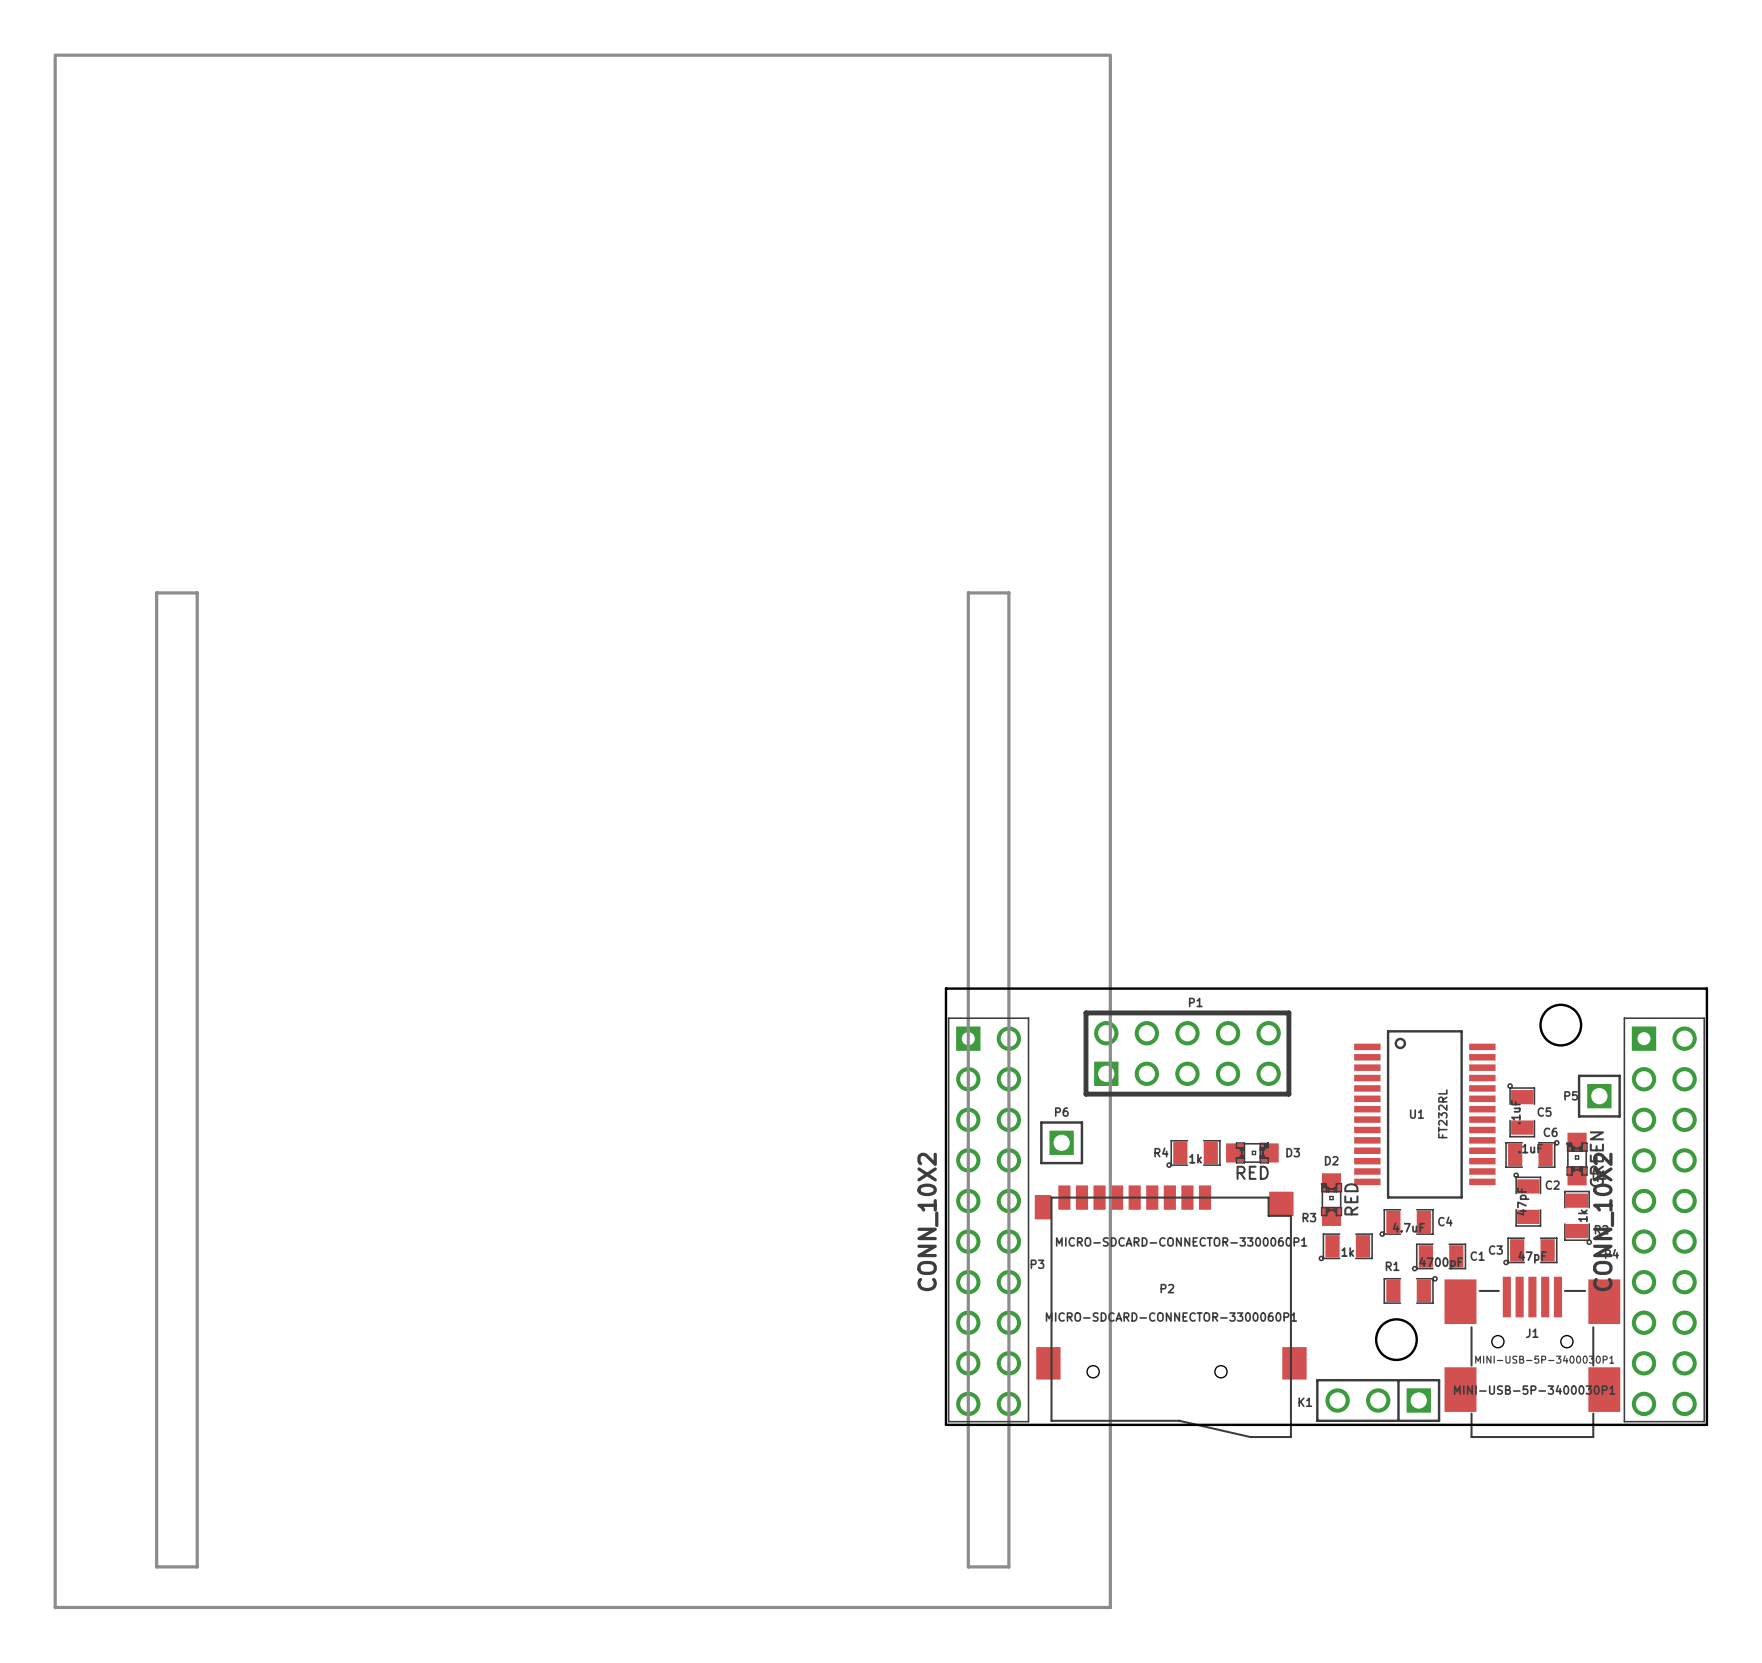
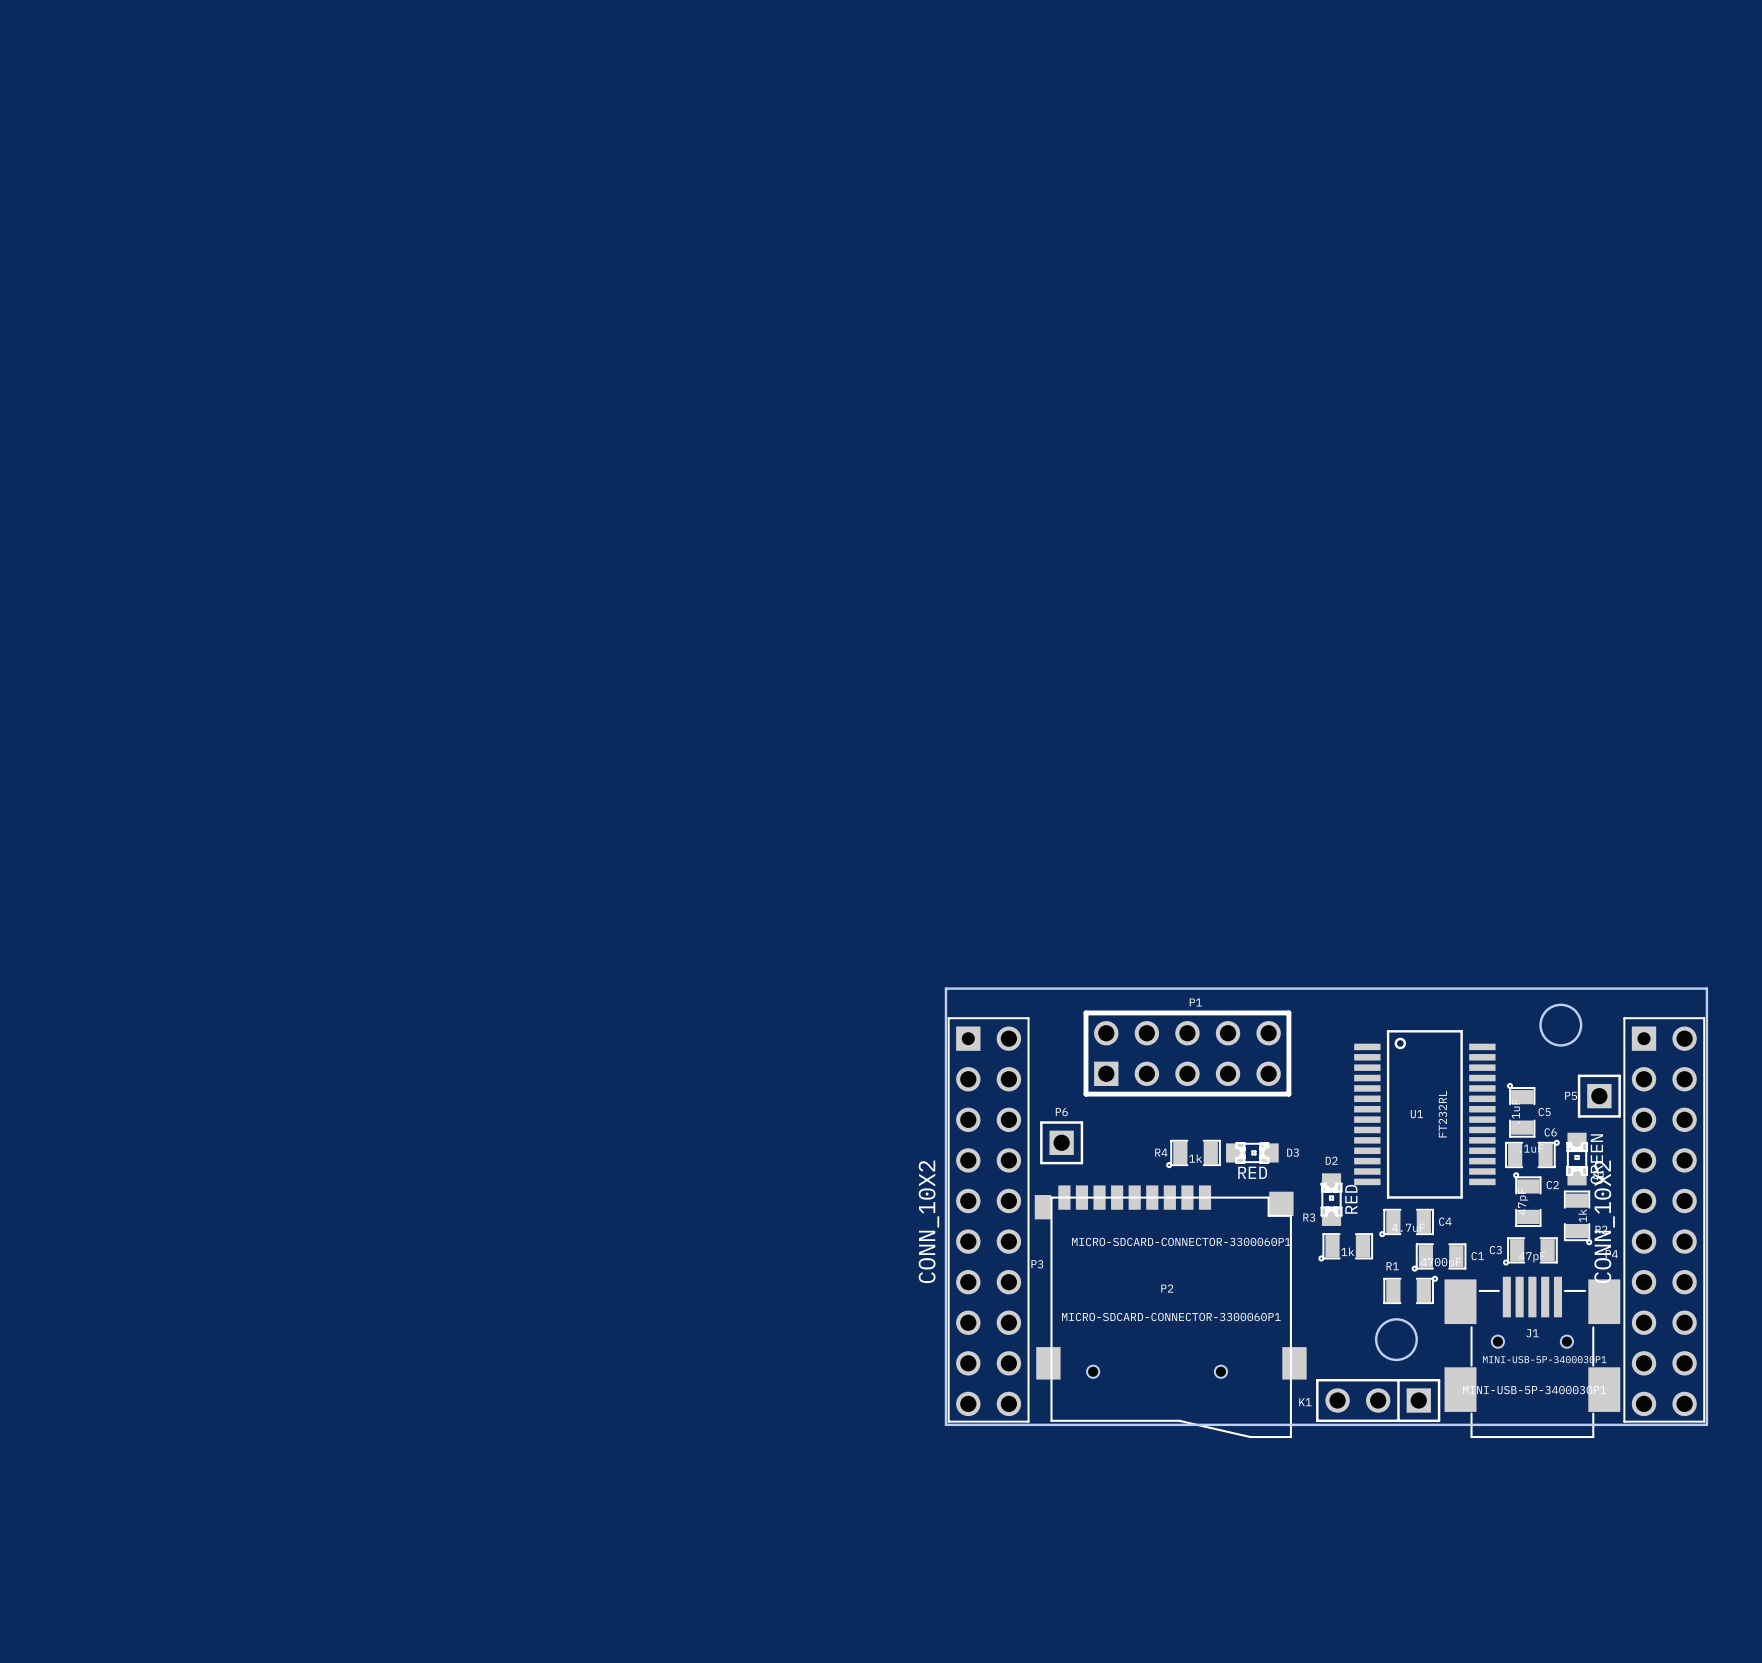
line: (55, 55) (1110, 55) -> none
line: (55, 57) (55, 1607) (1110, 1607) (1110, 57) -> none
line: (156, 592) (197, 592) (197, 1566) (156, 1566) (156, 592) -> none
line: (968, 592) (1008, 592) (1008, 1566) (968, 1566) (968, 592) -> none

